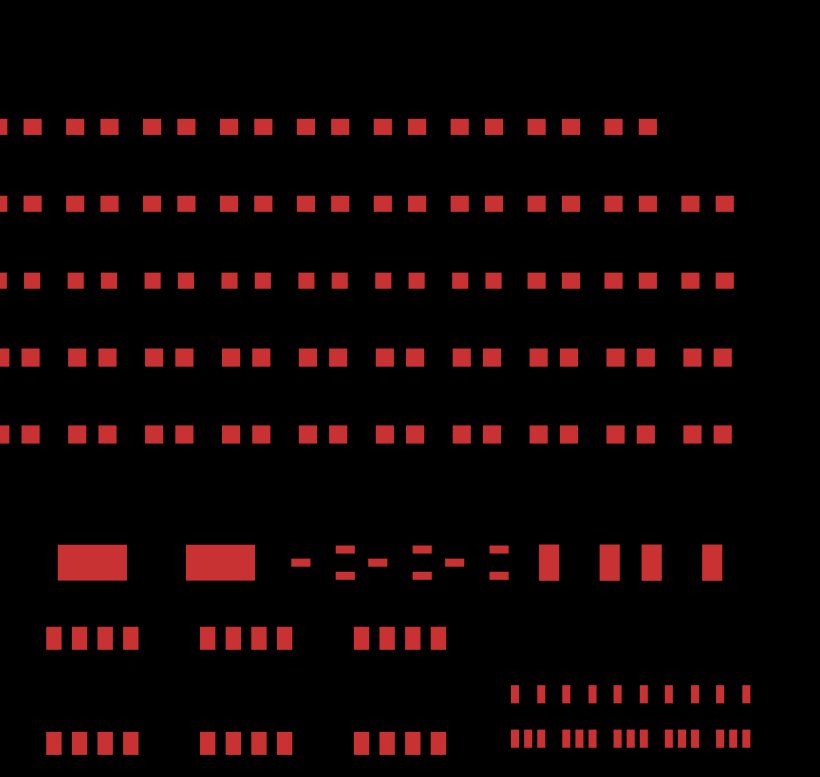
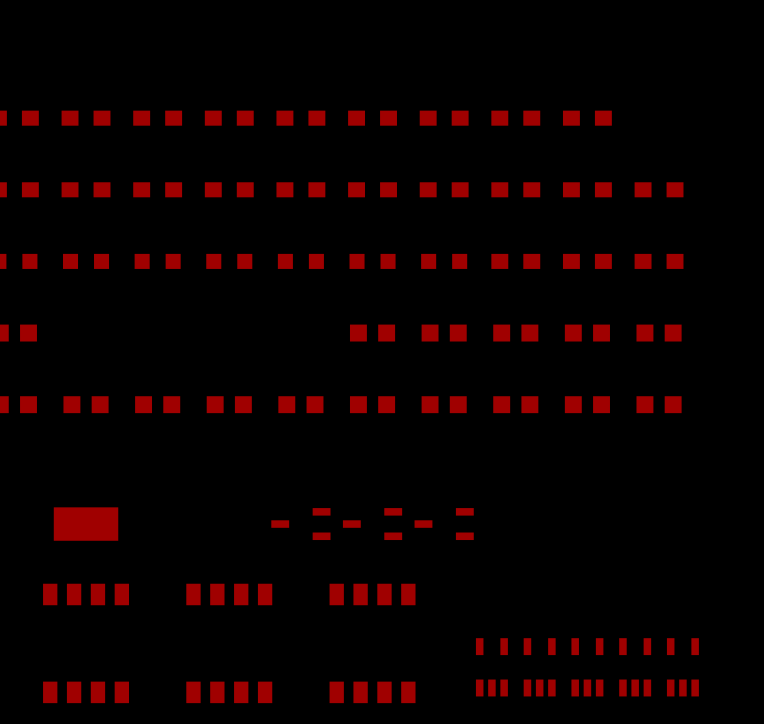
part: (92, 357) -> none
part: (169, 357) -> none
part: (246, 357) -> none
part: (323, 357) -> none
part: (220, 562) -> none
part: (579, 562) -> none
part: (681, 562) -> none

